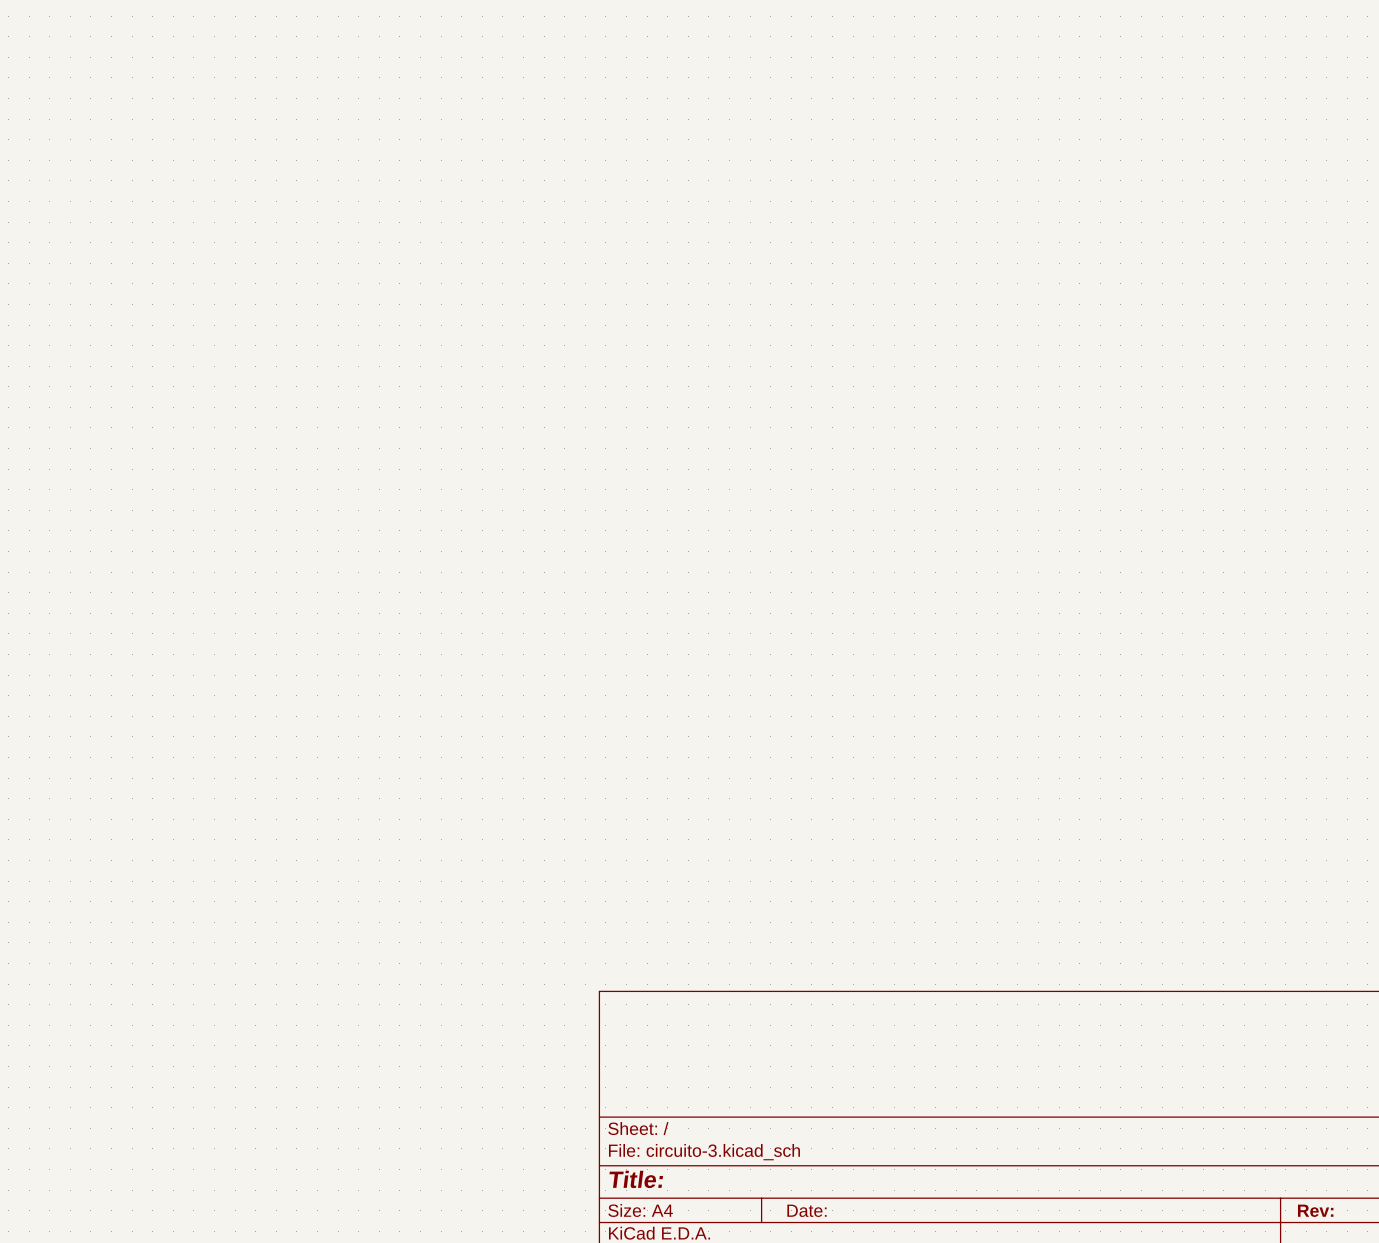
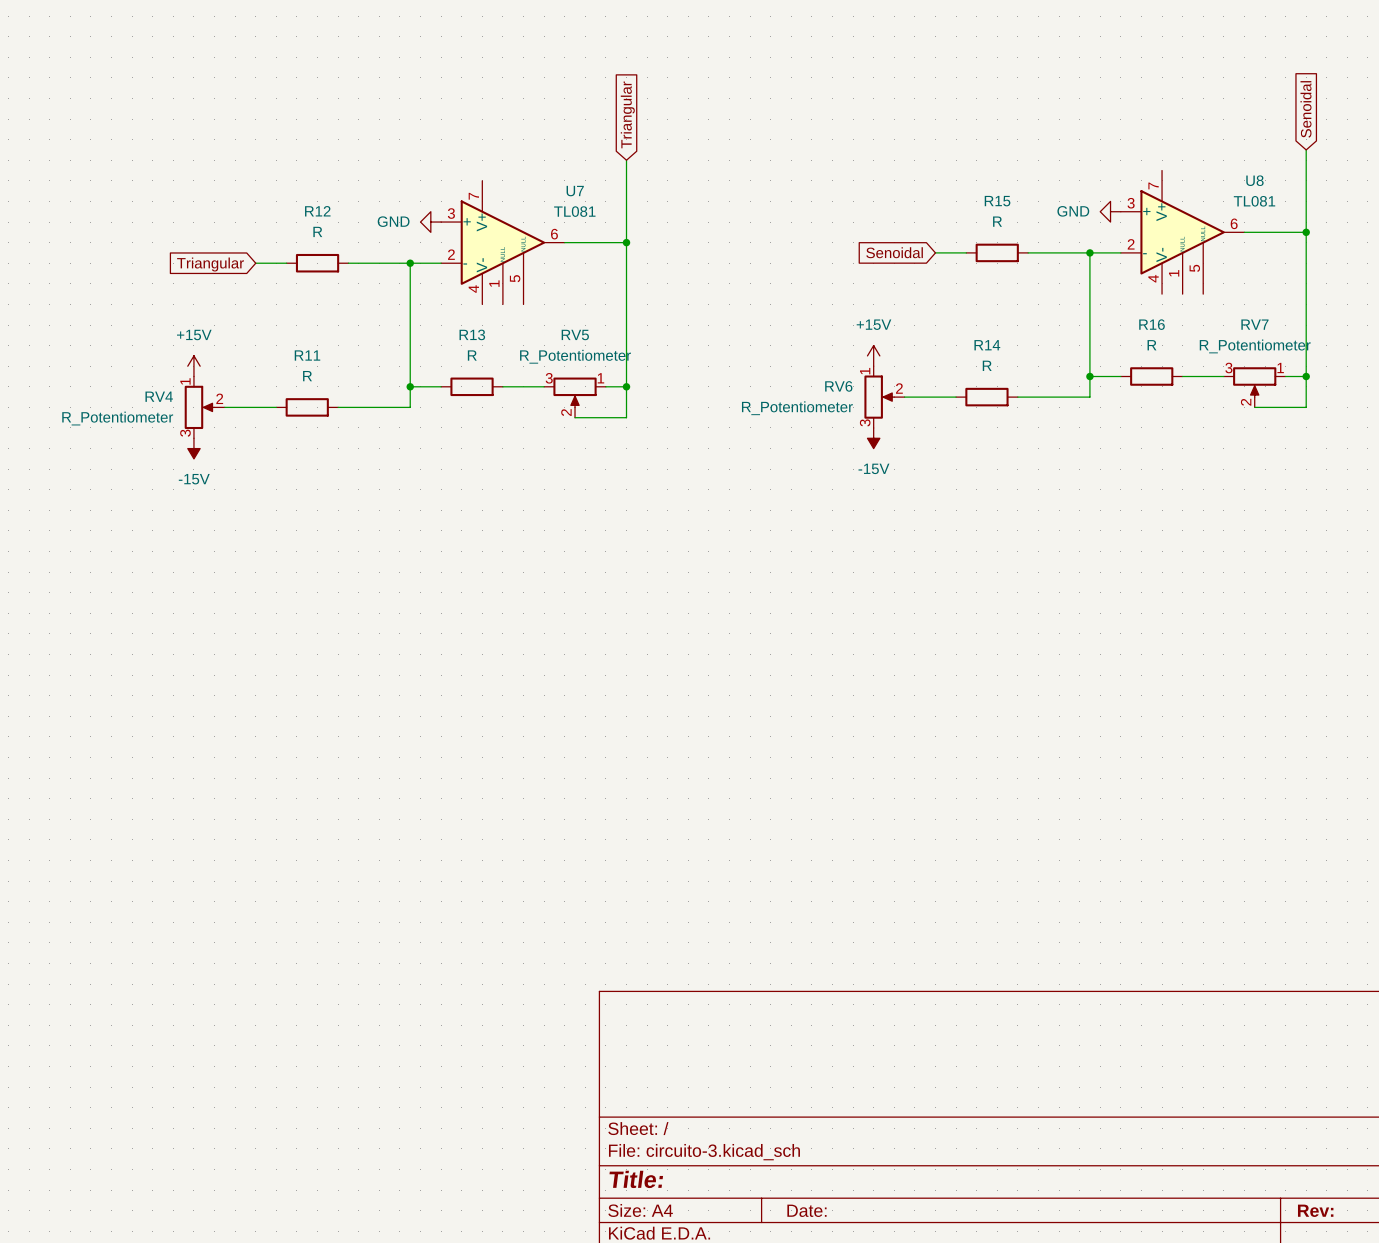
global label: none -> Senoidal (1306, 109)
global label: none -> Triangular (627, 114)
wire: none -> (1306, 149) (1306, 407) (1254, 407)
wire: none -> (626, 160) (626, 417) (575, 417)
power symbol: none -> GND (1110, 211)
power symbol: none -> GND (430, 222)
U8: none -> TL081 (1182, 232)
wire: none -> (1244, 232) (1306, 232)
junction: none -> (1306, 232)
U7: none -> TL081 (502, 242)
wire: none -> (564, 242) (626, 242)
junction: none -> (626, 242)
global label: none -> Senoidal (894, 252)
wire: none -> (935, 252) (966, 252)
R15: none -> R (997, 252)
wire: none -> (1028, 252) (1120, 252)
wire: none -> (1089, 252) (1089, 397) (1017, 397)
junction: none -> (1089, 252)
wire: none -> (255, 263) (286, 263)
R12: none -> R (317, 263)
wire: none -> (348, 263) (441, 263)
wire: none -> (410, 263) (410, 407) (338, 407)
junction: none -> (410, 263)
global label: none -> Triangular (210, 264)
power symbol: none -> +15V (873, 355)
power symbol: none -> +15V (193, 366)
wire: none -> (1089, 376) (1120, 376)
junction: none -> (1089, 376)
R16: none -> R (1151, 376)
wire: none -> (1182, 376) (1223, 376)
wire: none -> (1285, 376) (1306, 376)
junction: none -> (1306, 376)
wire: none -> (410, 386) (441, 386)
junction: none -> (410, 386)
R13: none -> R (472, 386)
wire: none -> (502, 386) (544, 386)
wire: none -> (605, 386) (626, 386)
junction: none -> (626, 386)
RV7: none -> R_Potentiometer (1254, 387)
RV5: none -> R_Potentiometer (575, 397)
RV6: none -> R_Potentiometer (884, 397)
wire: none -> (904, 397) (956, 397)
R14: none -> R (986, 397)
RV4: none -> R_Potentiometer (204, 407)
wire: none -> (224, 407) (276, 407)
R11: none -> R (307, 407)
power symbol: none -> -15V (873, 438)
power symbol: none -> -15V (193, 448)

